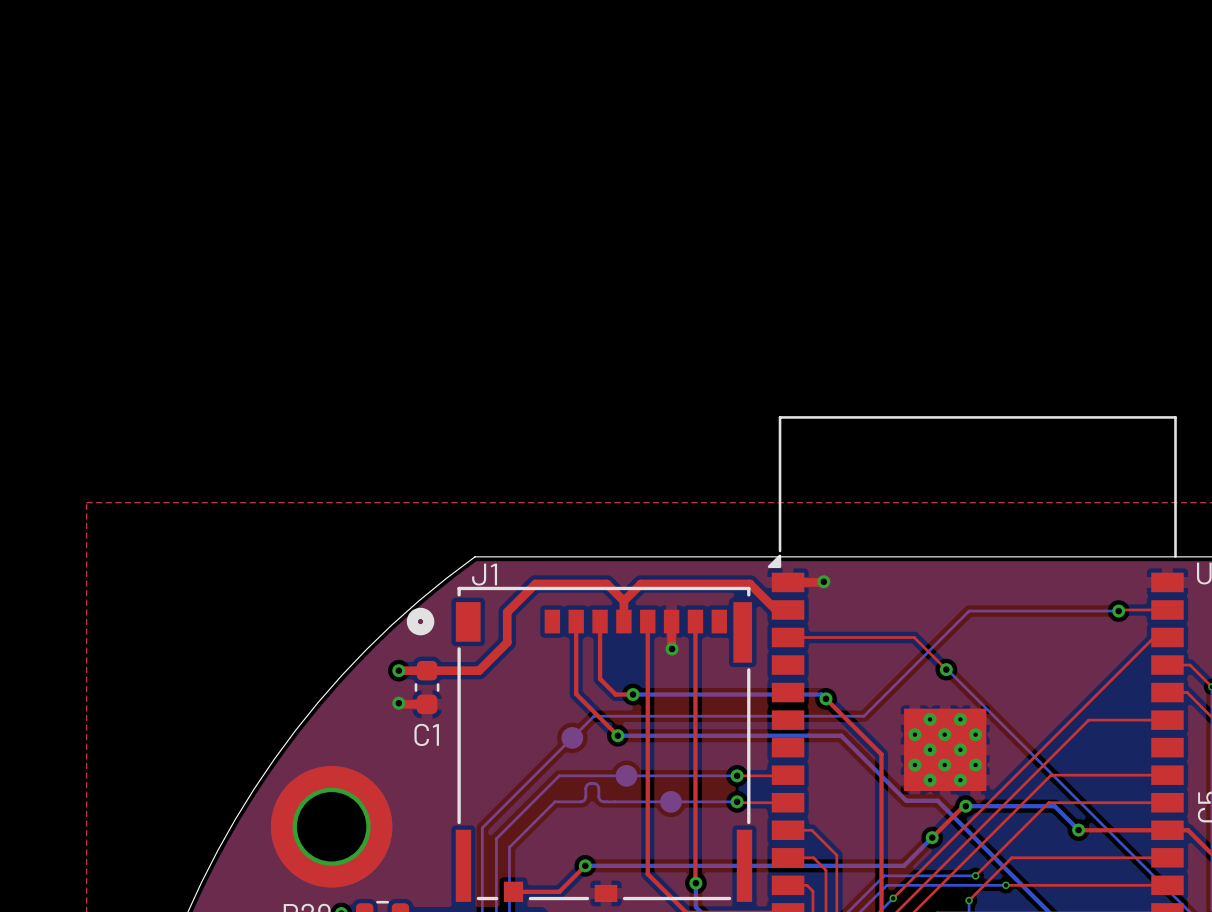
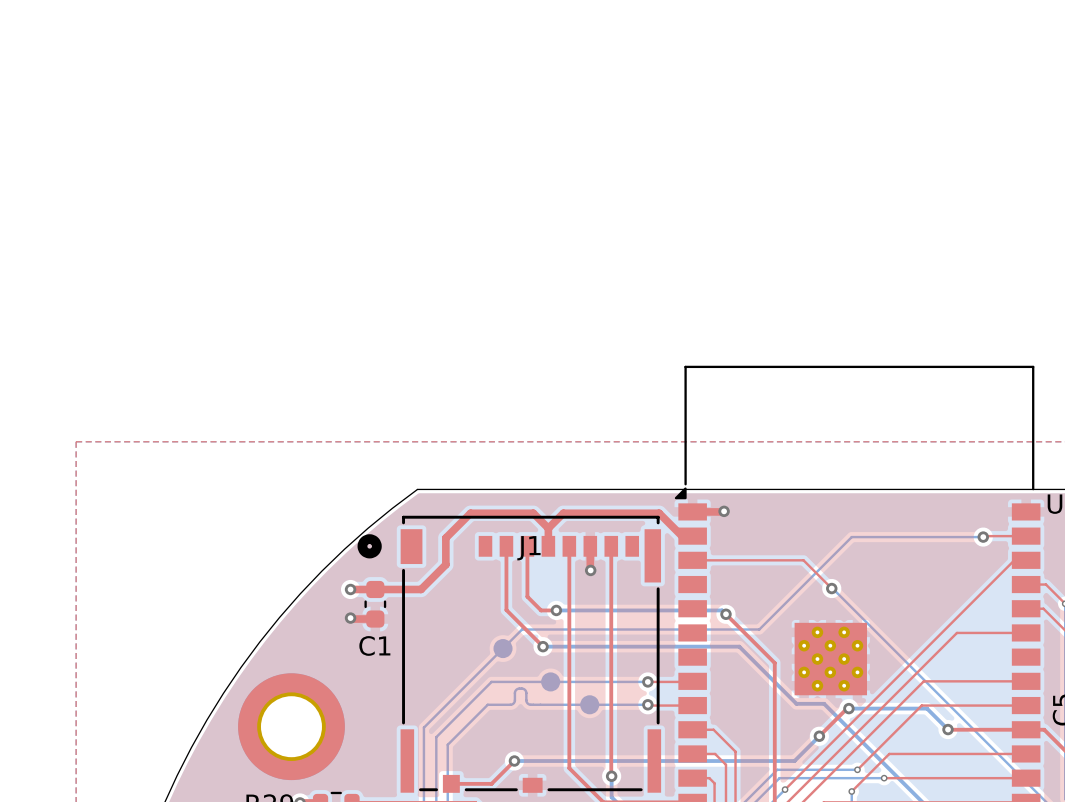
J1 name position: J1 (484, 574) -> J1 (528, 548)

